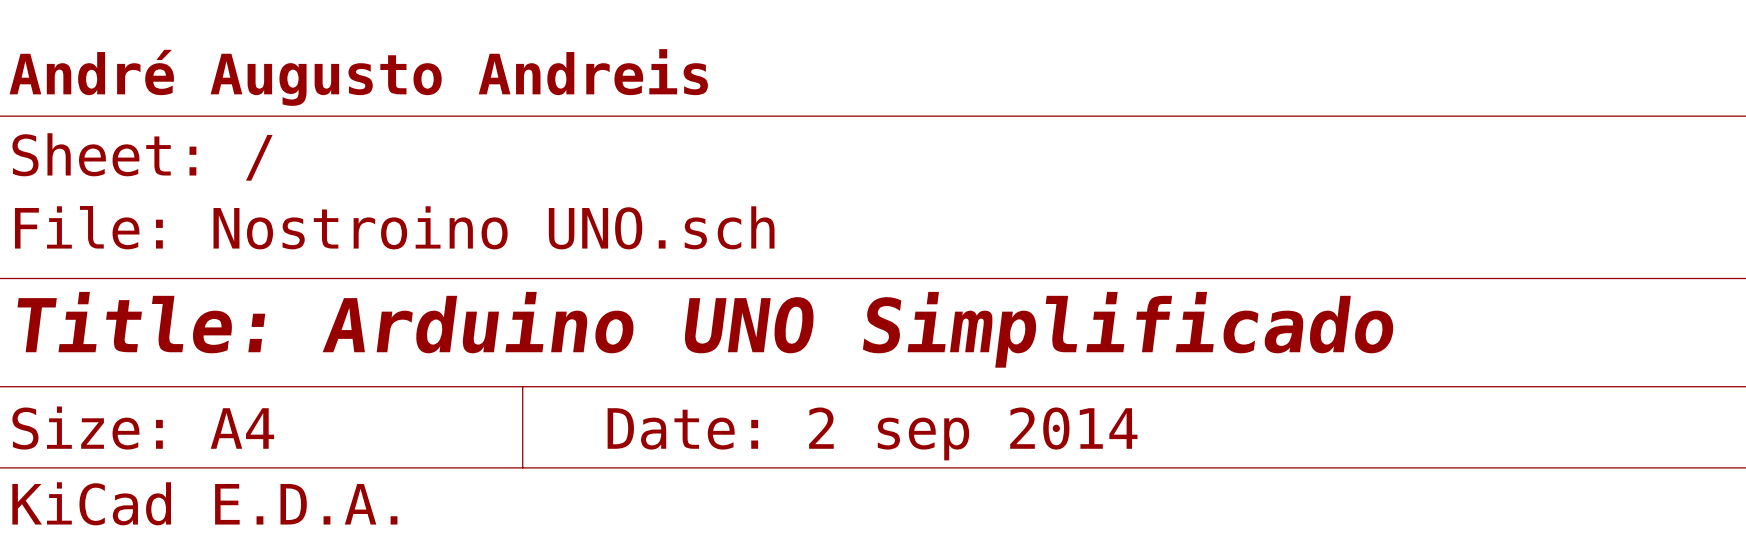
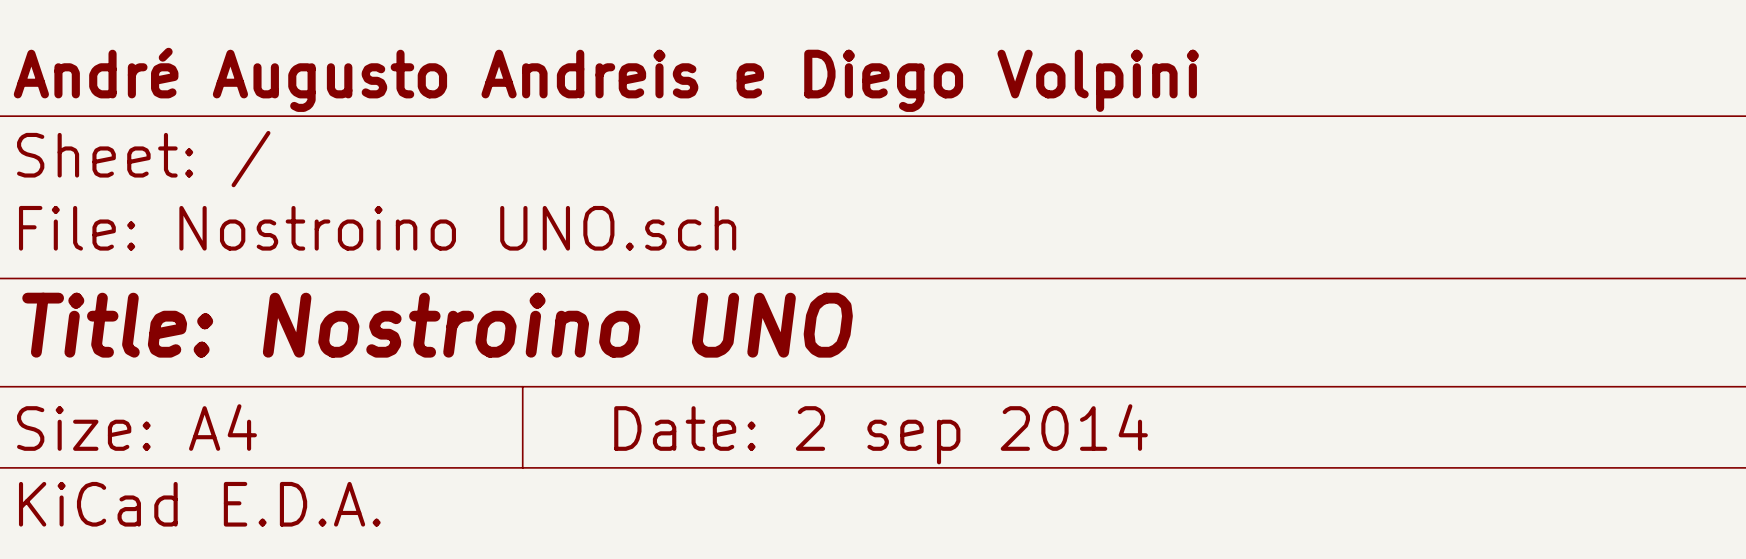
title block: André Augusto Andreis (358, 77) -> André Augusto Andreis e Diego Volpini (606, 79)
title block: Title: Arduino UNO Simplificado (705, 329) -> Title: Nostroino UNO (437, 325)

